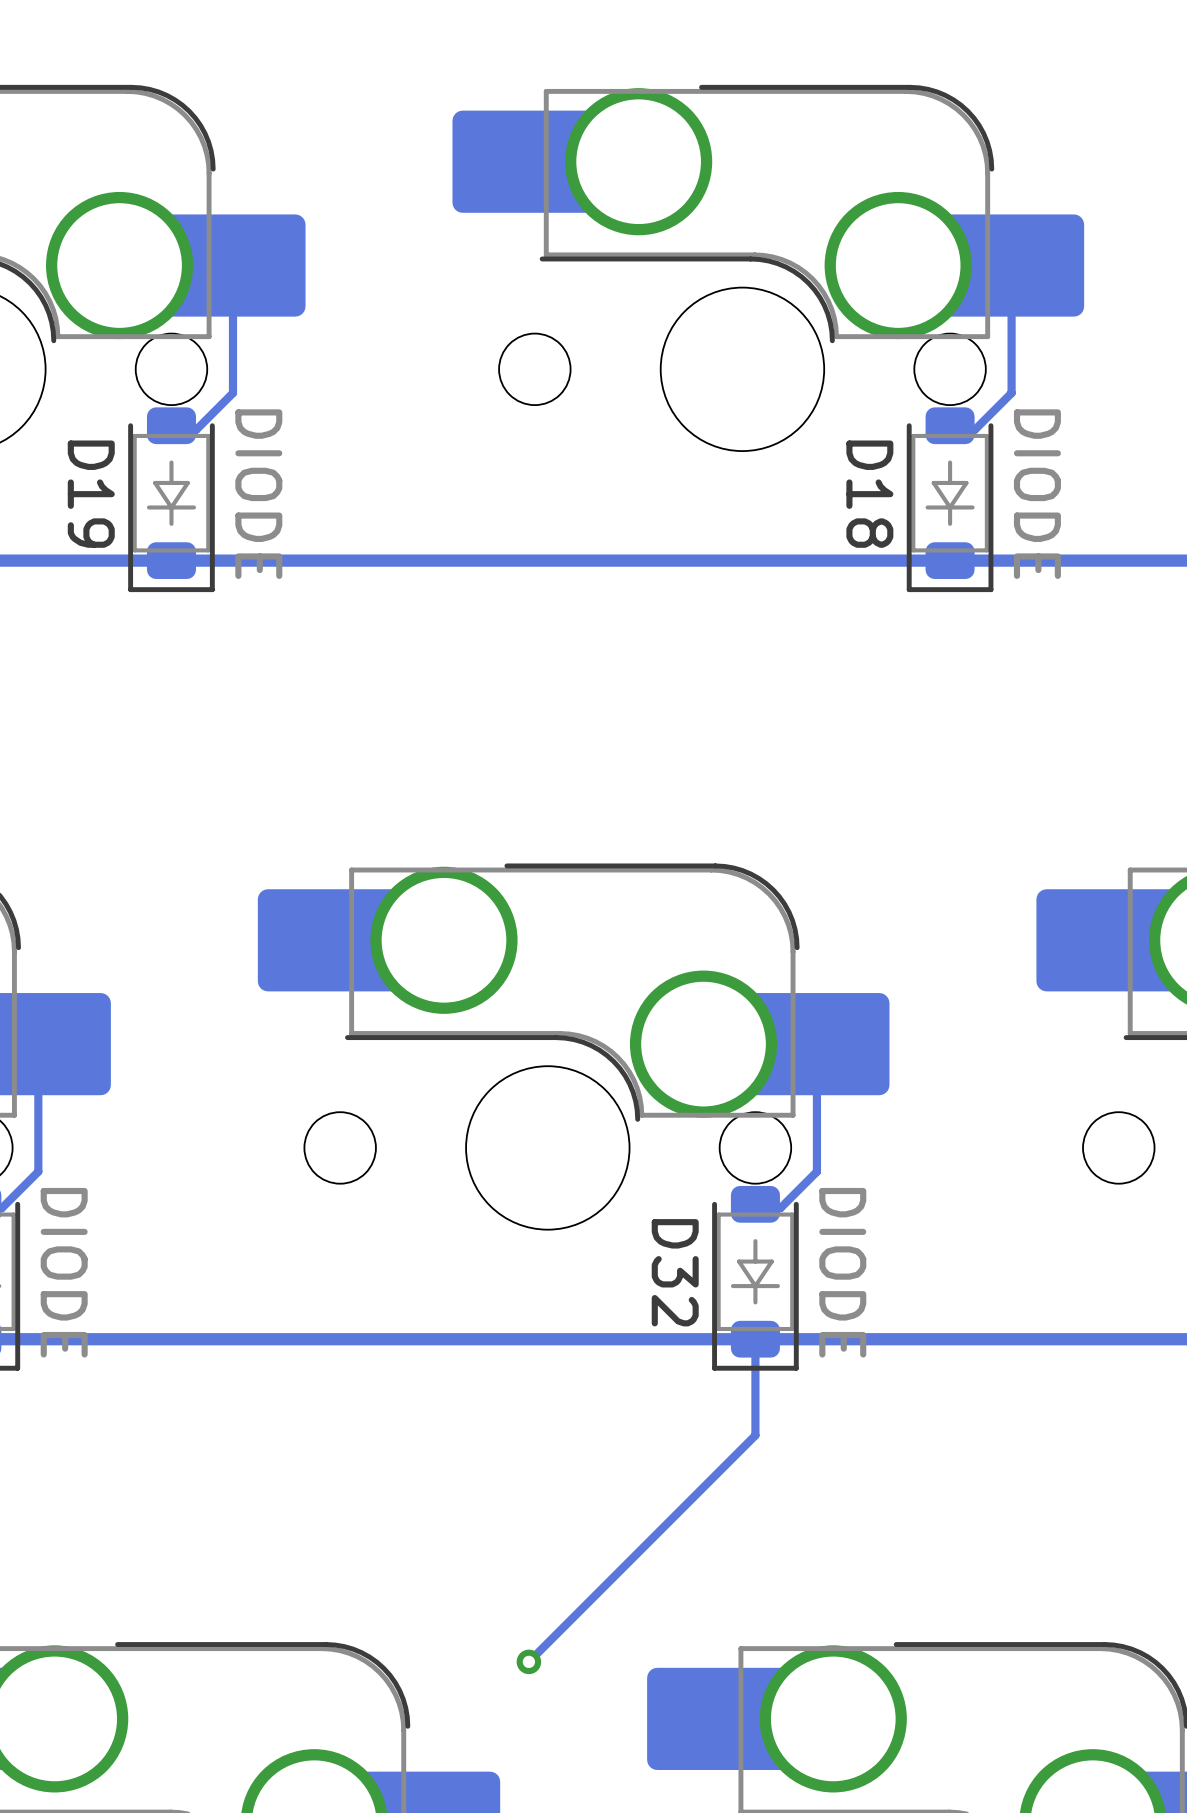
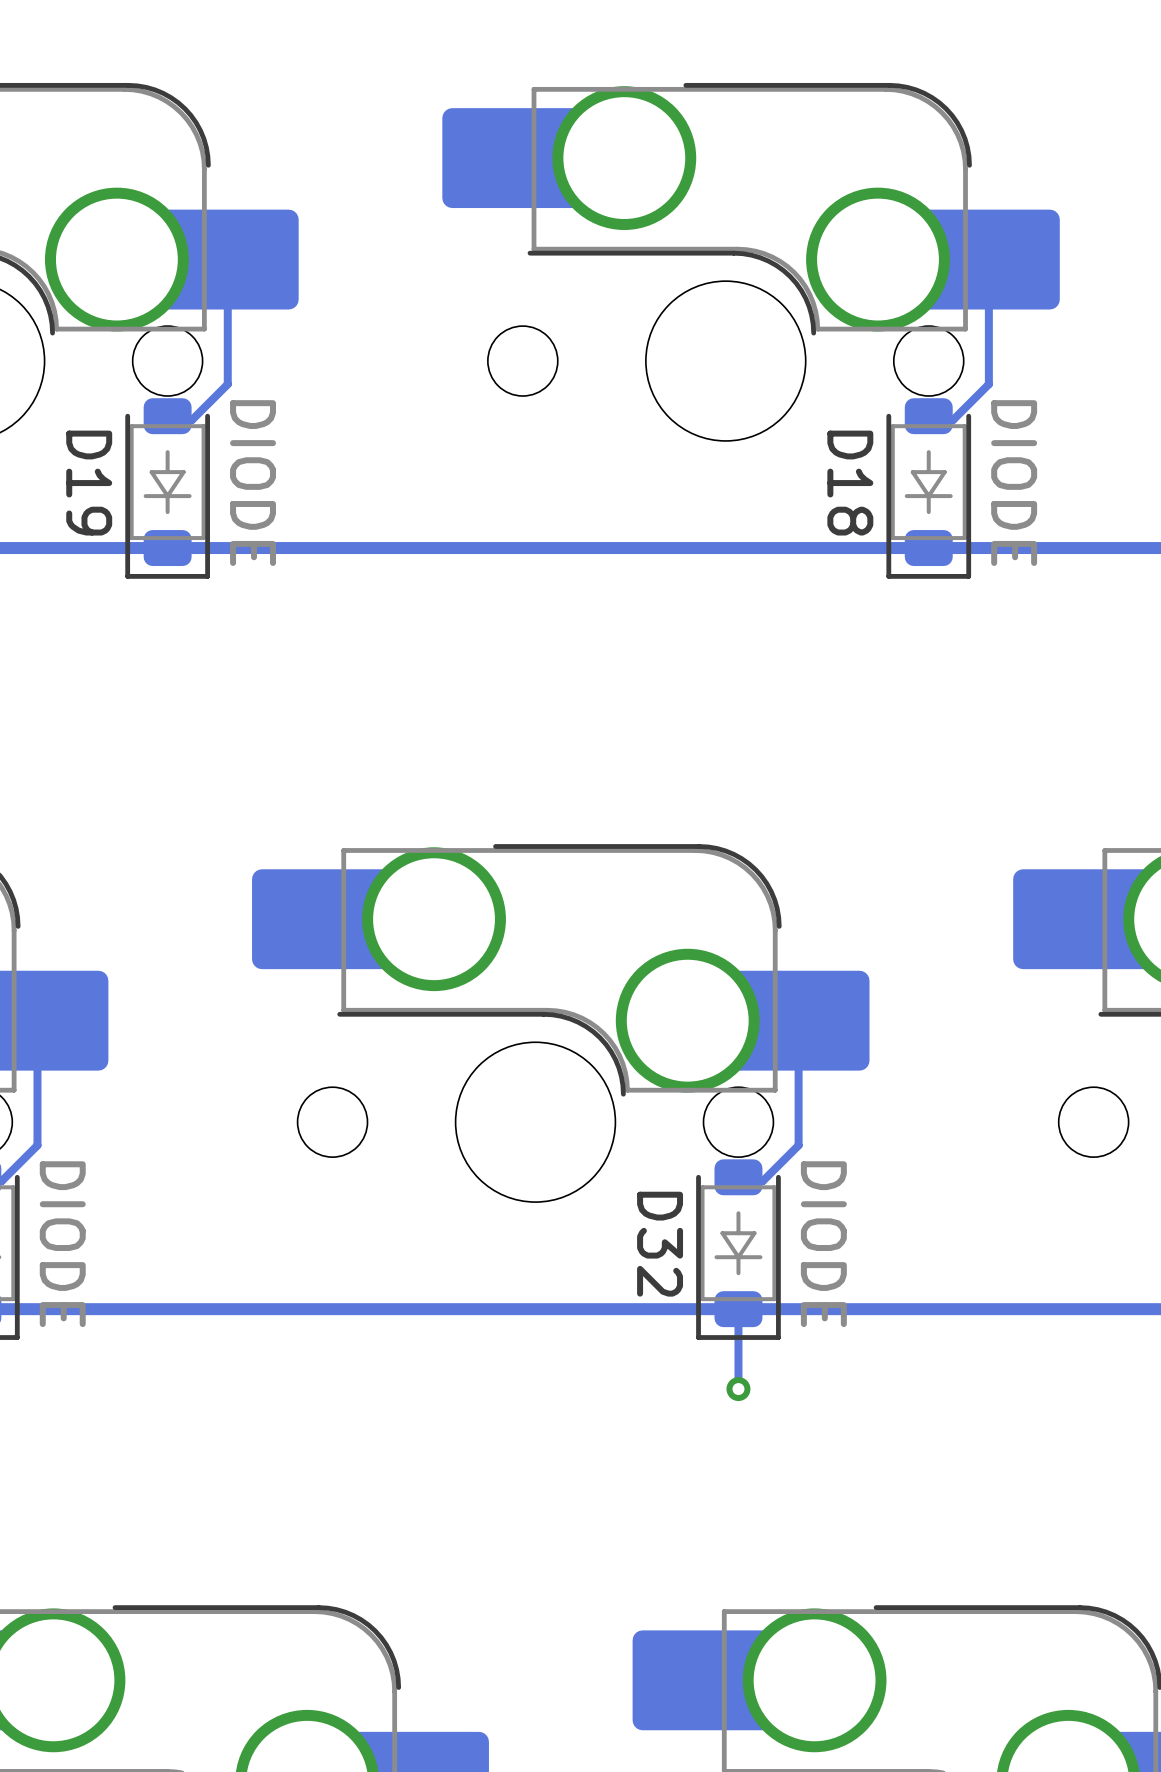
track: (755, 1420) (755, 1435) (528, 1661) -> none
via: none -> (738, 1389)
via: (528, 1661) -> none

